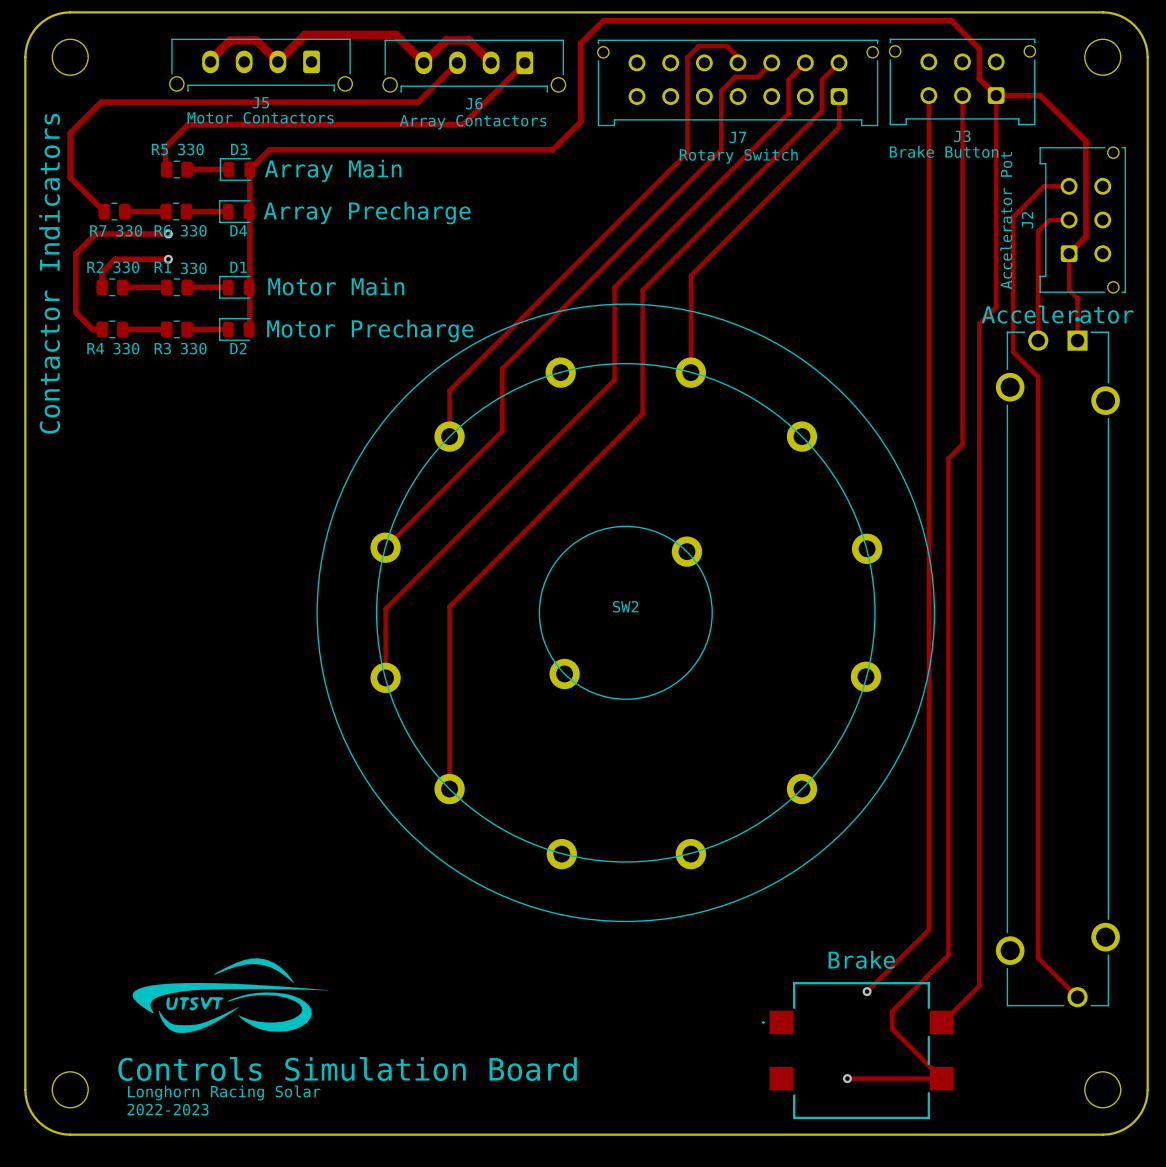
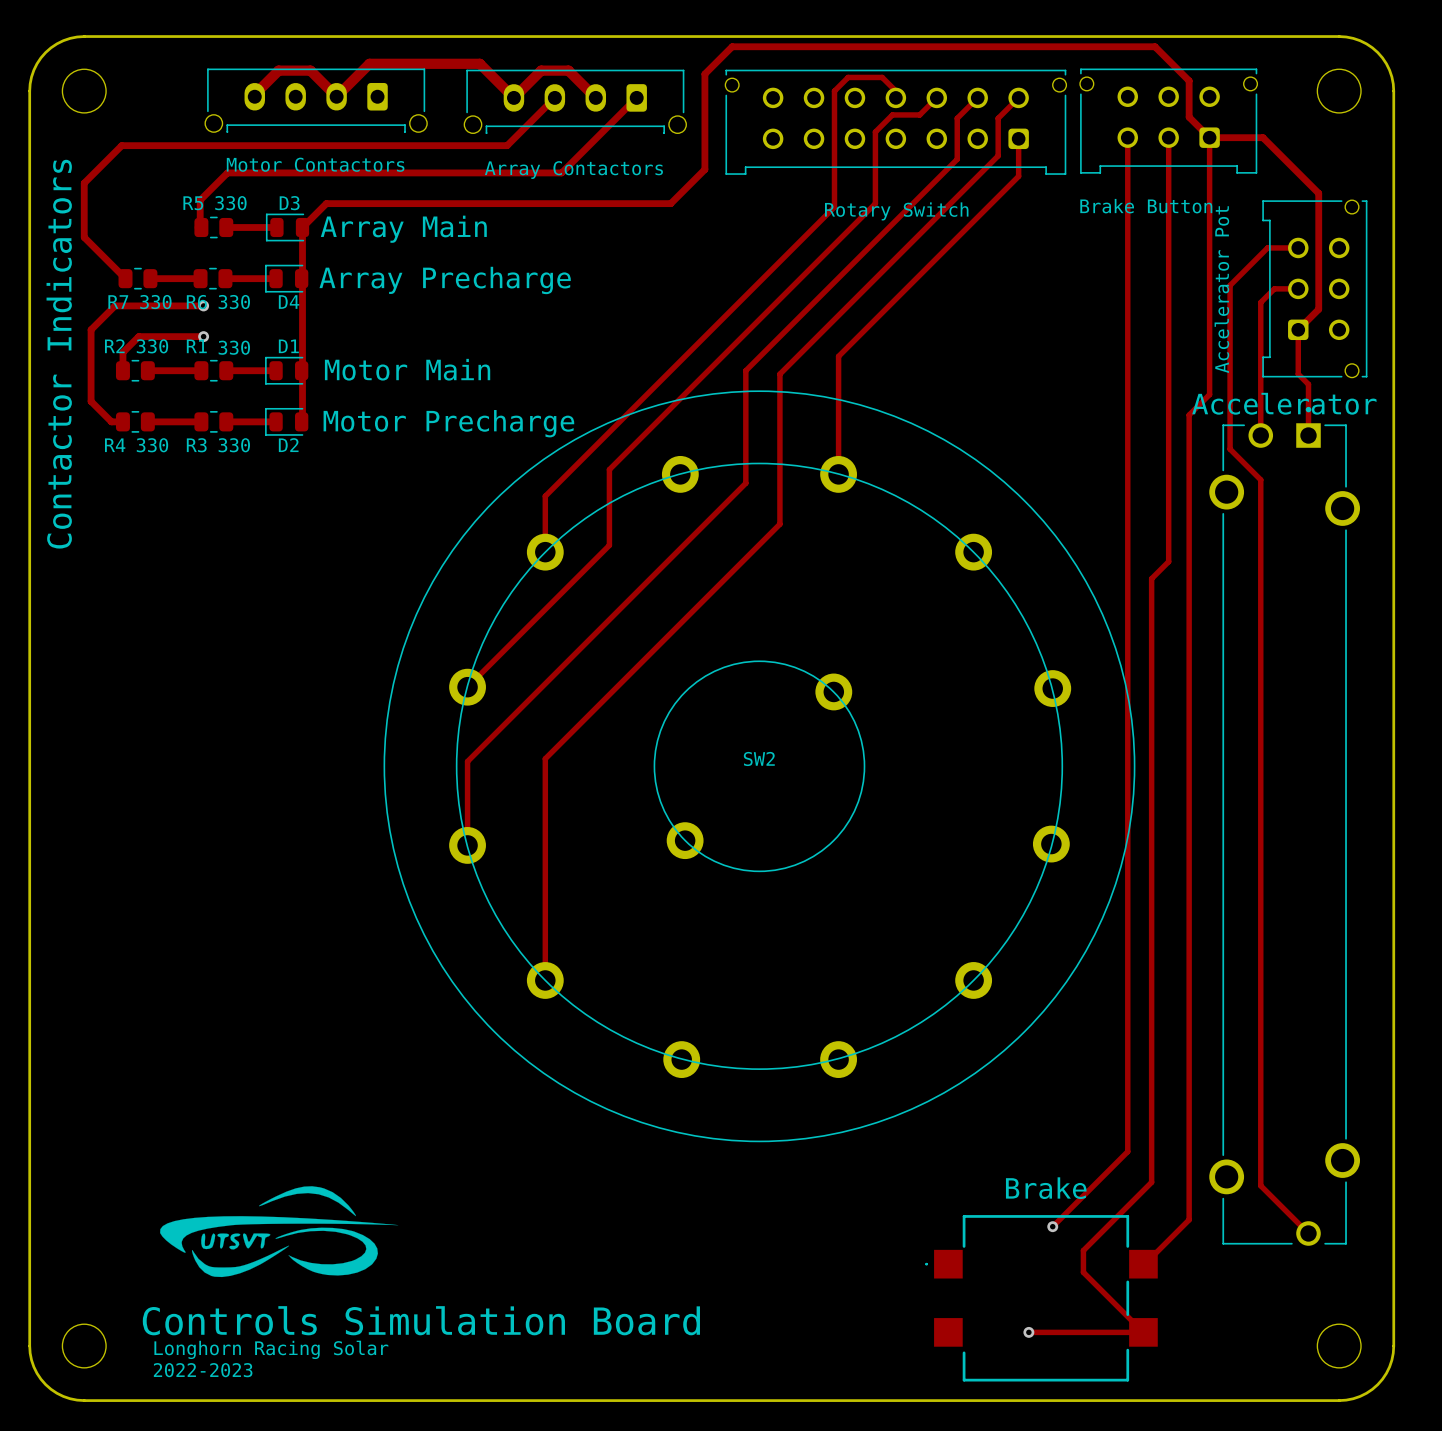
J5 name: J5 (260, 102) -> none
J6 name: J6 (474, 103) -> none
J3 name: J3 (962, 136) -> none
J7 name: J7 (737, 137) -> none
J2 name: J2 (1027, 220) -> none

